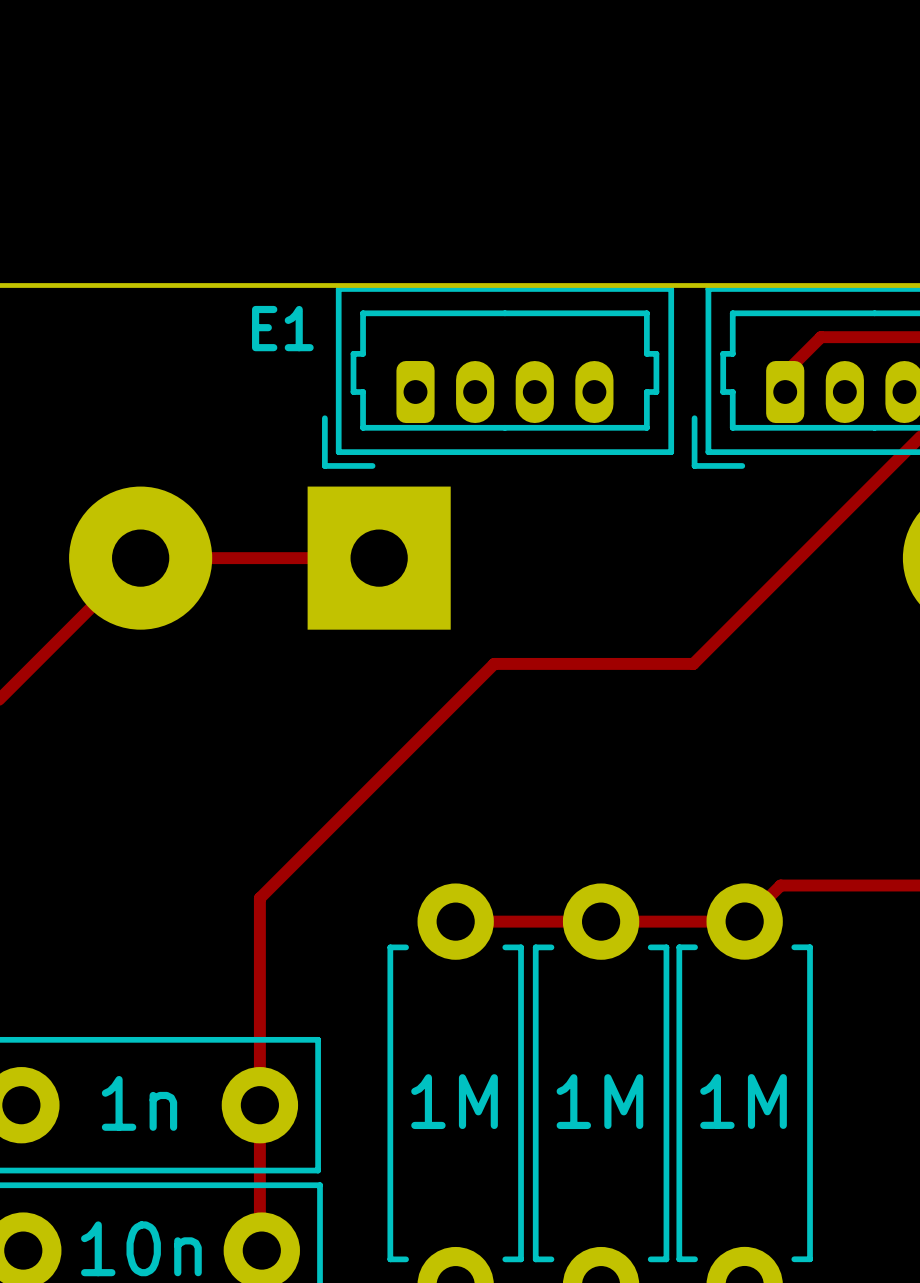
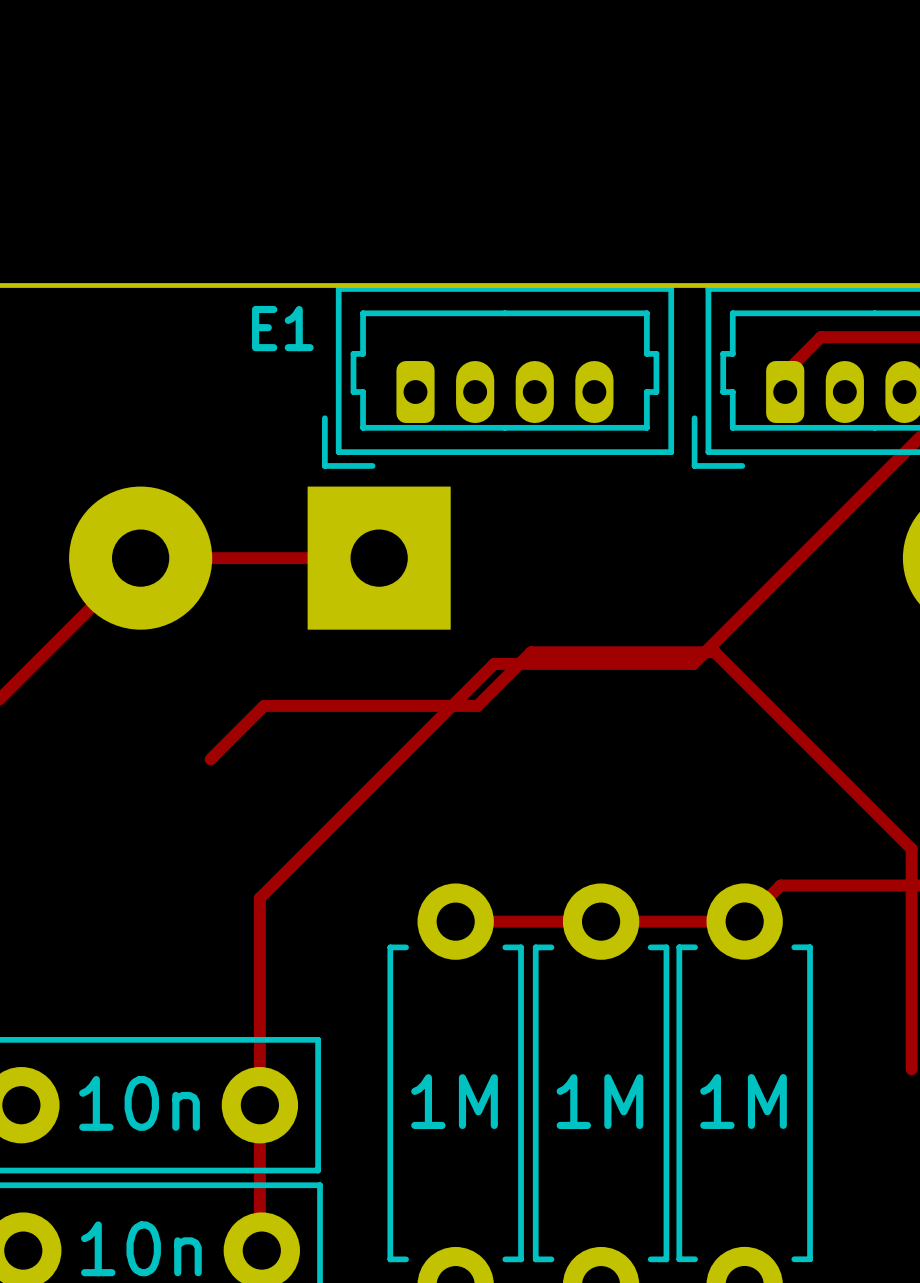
track: none -> (210, 759) (264, 705) (477, 705) (531, 652) (714, 652) (911, 849) (911, 1069)
part value: 1n (139, 1103) -> 10n (139, 1103)

